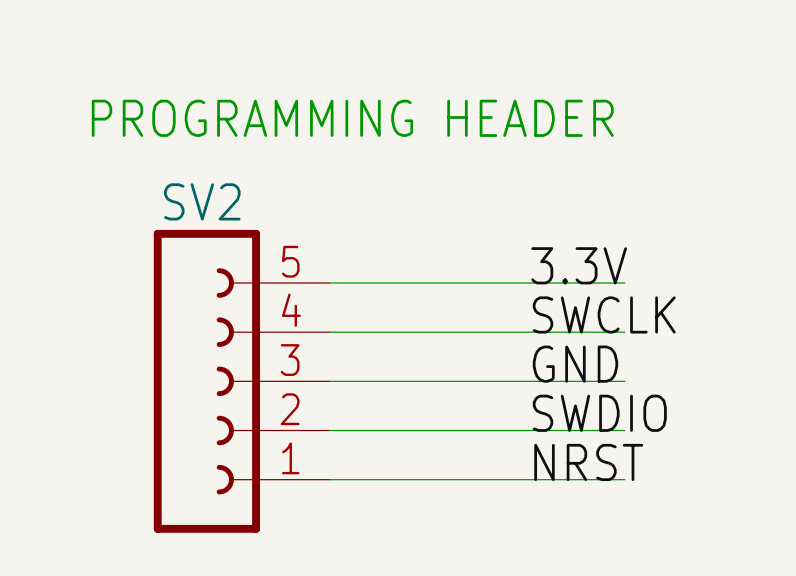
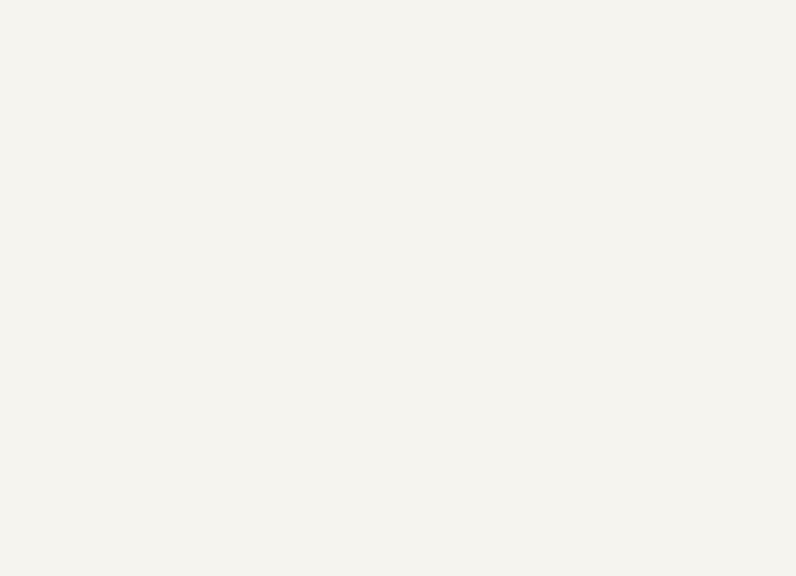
text: PROGRAMMING HEADER (352, 118) -> none
label: 3.3V (579, 265) -> none
wire: (329, 283) (624, 283) -> none
label: SWCLK (604, 314) -> none
wire: (329, 332) (624, 332) -> none
label: GND (575, 364) -> none
SV2: (241, 381) -> none
wire: (329, 381) (624, 381) -> none
label: SWDIO (599, 413) -> none
wire: (329, 430) (624, 430) -> none
label: NRST (588, 462) -> none
wire: (329, 479) (624, 479) -> none

